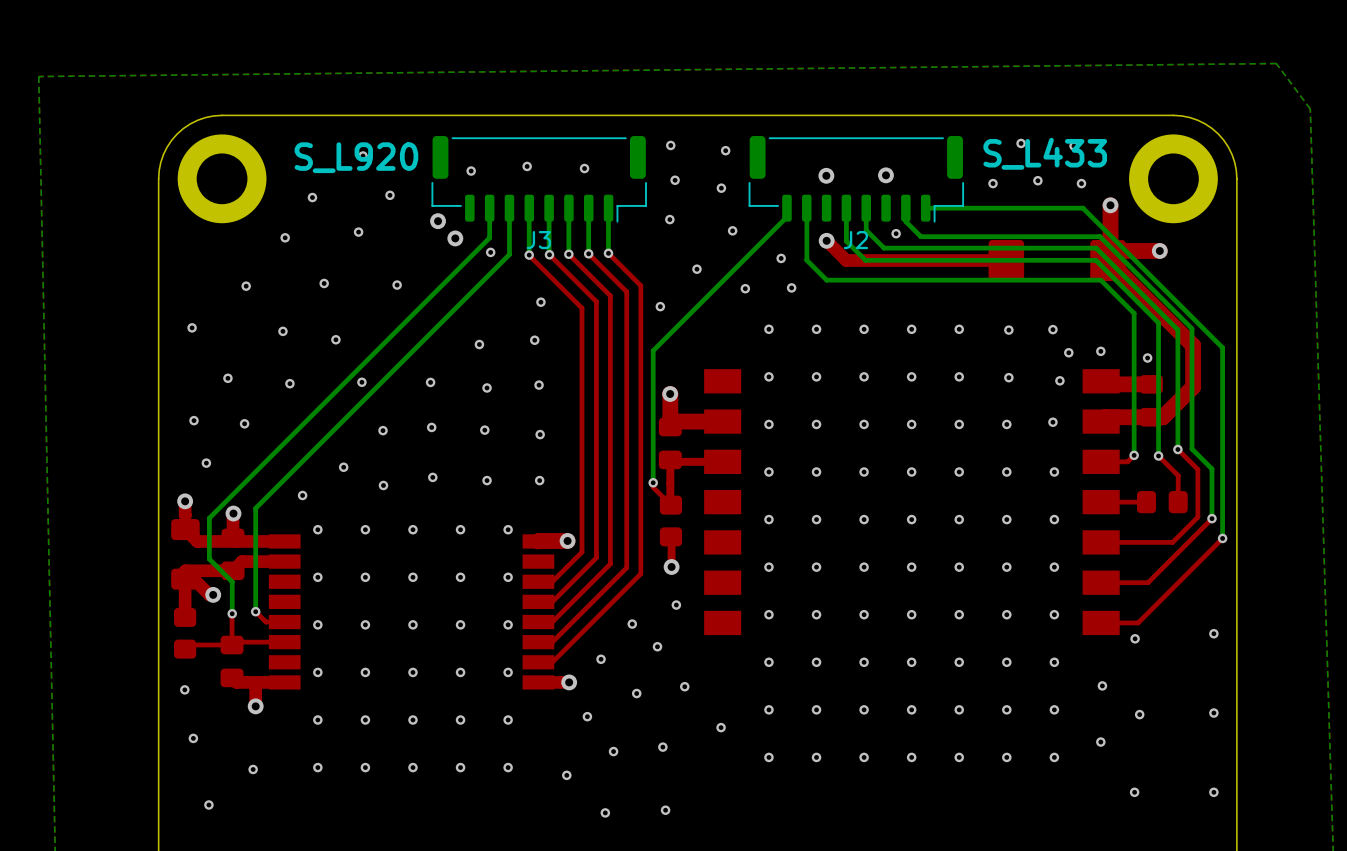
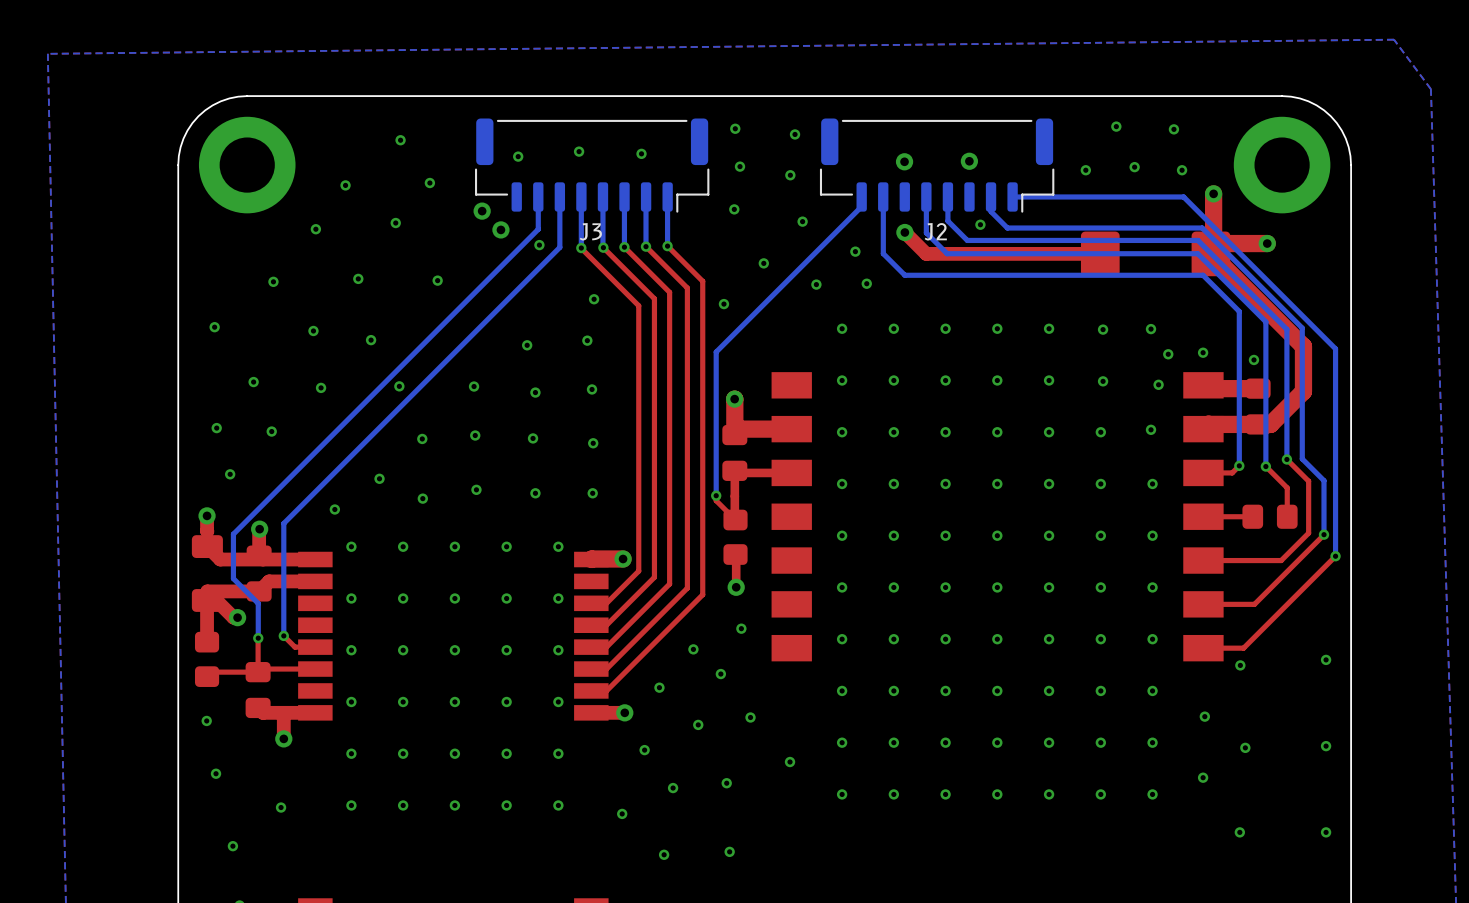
text: S_L433 (1045, 153) -> none
text: S_L920 (356, 157) -> none

